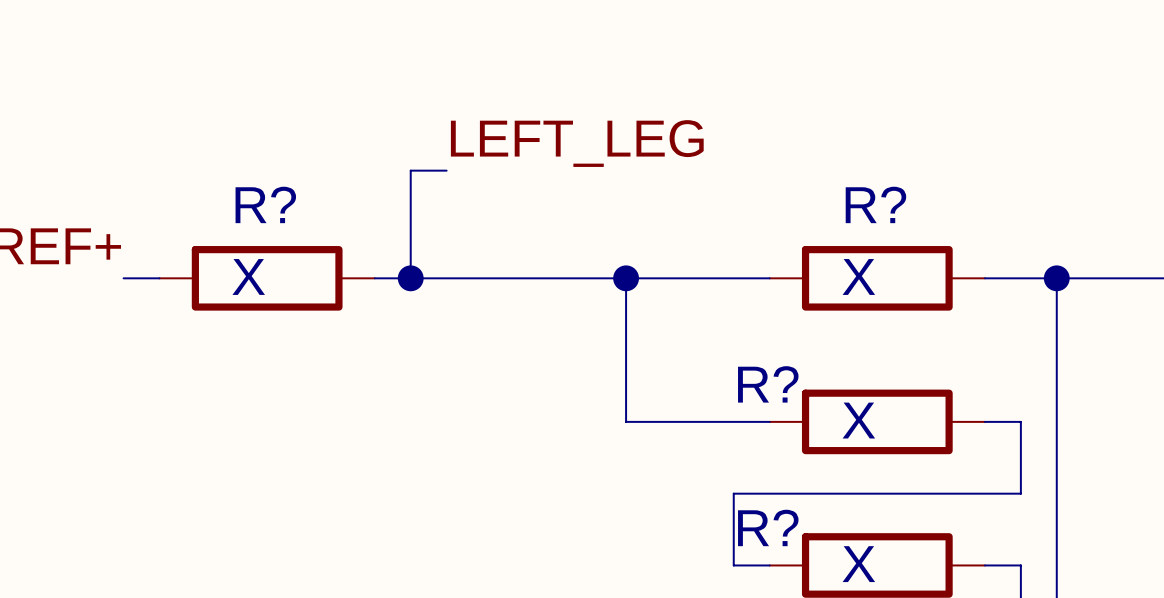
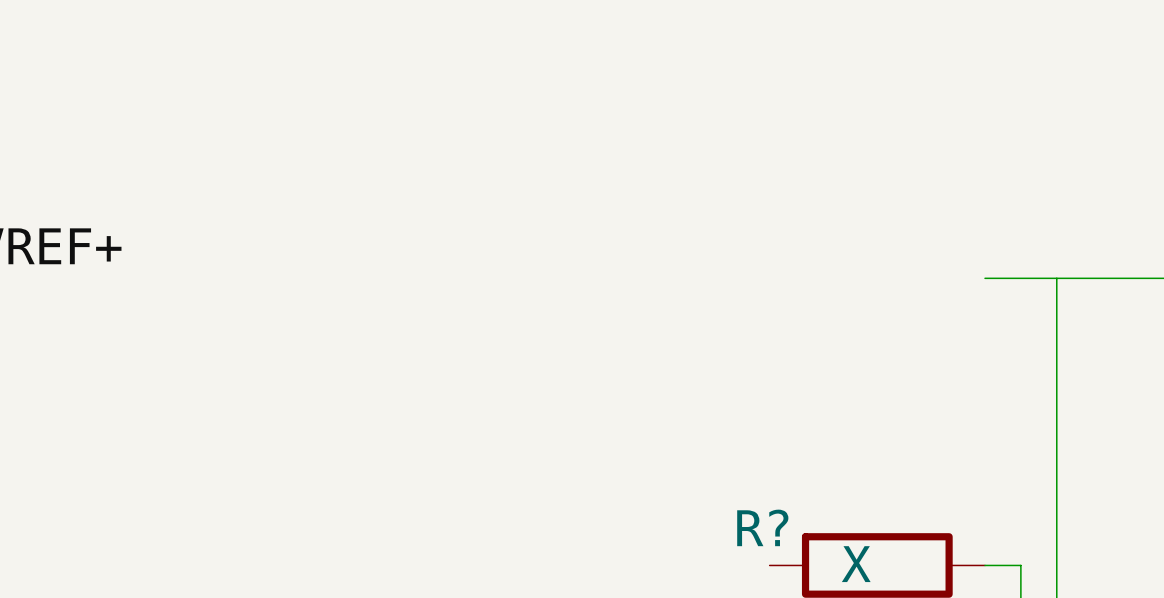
label: LEFT_LEG (577, 143) -> none
wire: (446, 170) (410, 170) (410, 278) -> none
wire: (123, 278) (159, 278) -> none
R?: X (267, 278) -> none
wire: (374, 278) (769, 278) -> none
junction: (410, 278) -> none
wire: (626, 278) (626, 421) (769, 421) -> none
junction: (626, 278) -> none
R?: X (877, 278) -> none
junction: (1056, 278) -> none
R?: X (877, 421) -> none
wire: (984, 421) (1020, 421) (1020, 493) (733, 493) (733, 565) (769, 565) -> none

